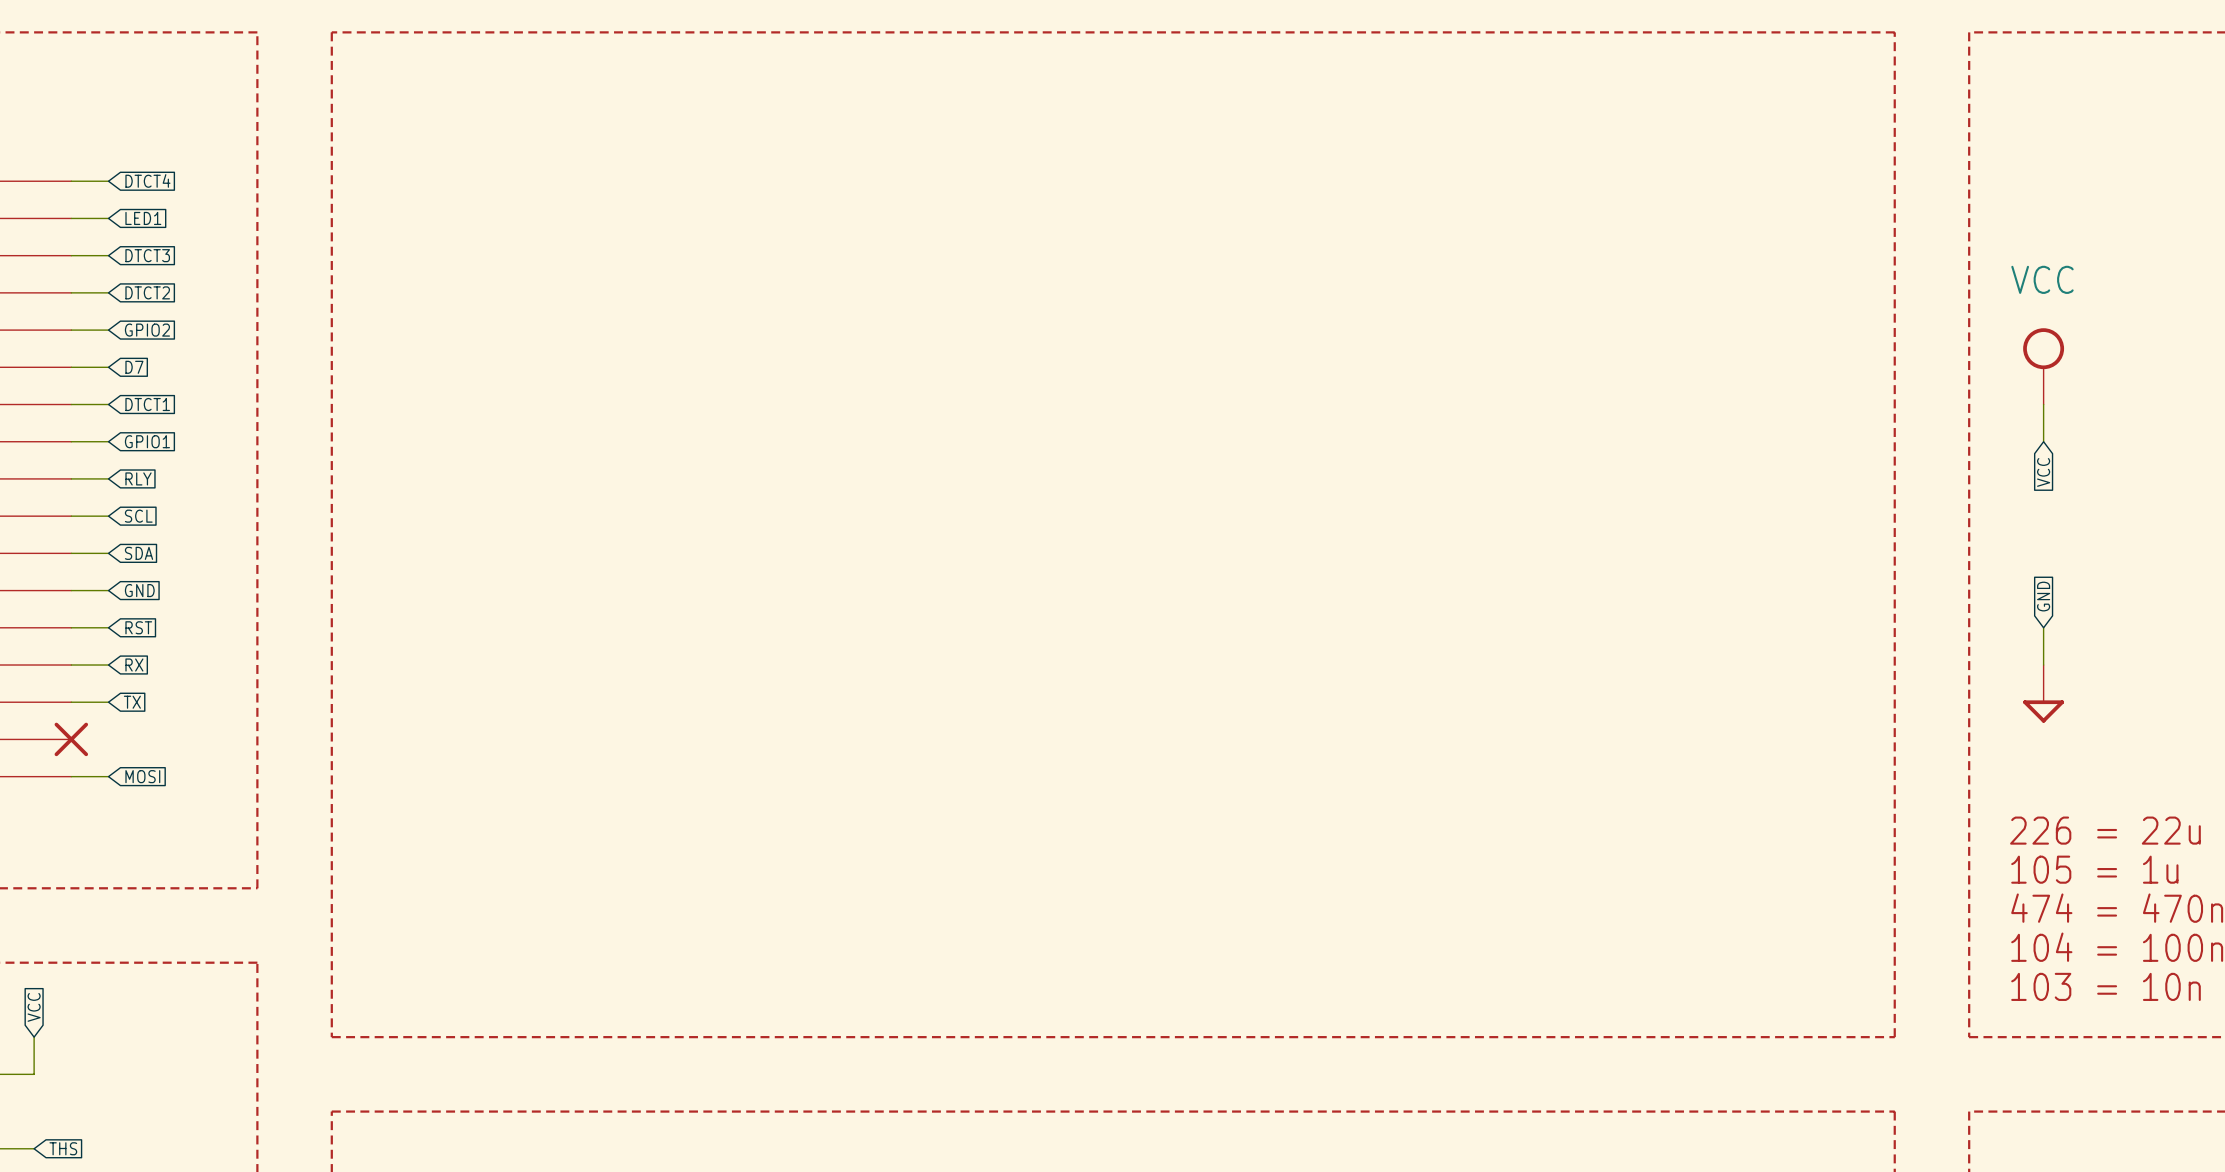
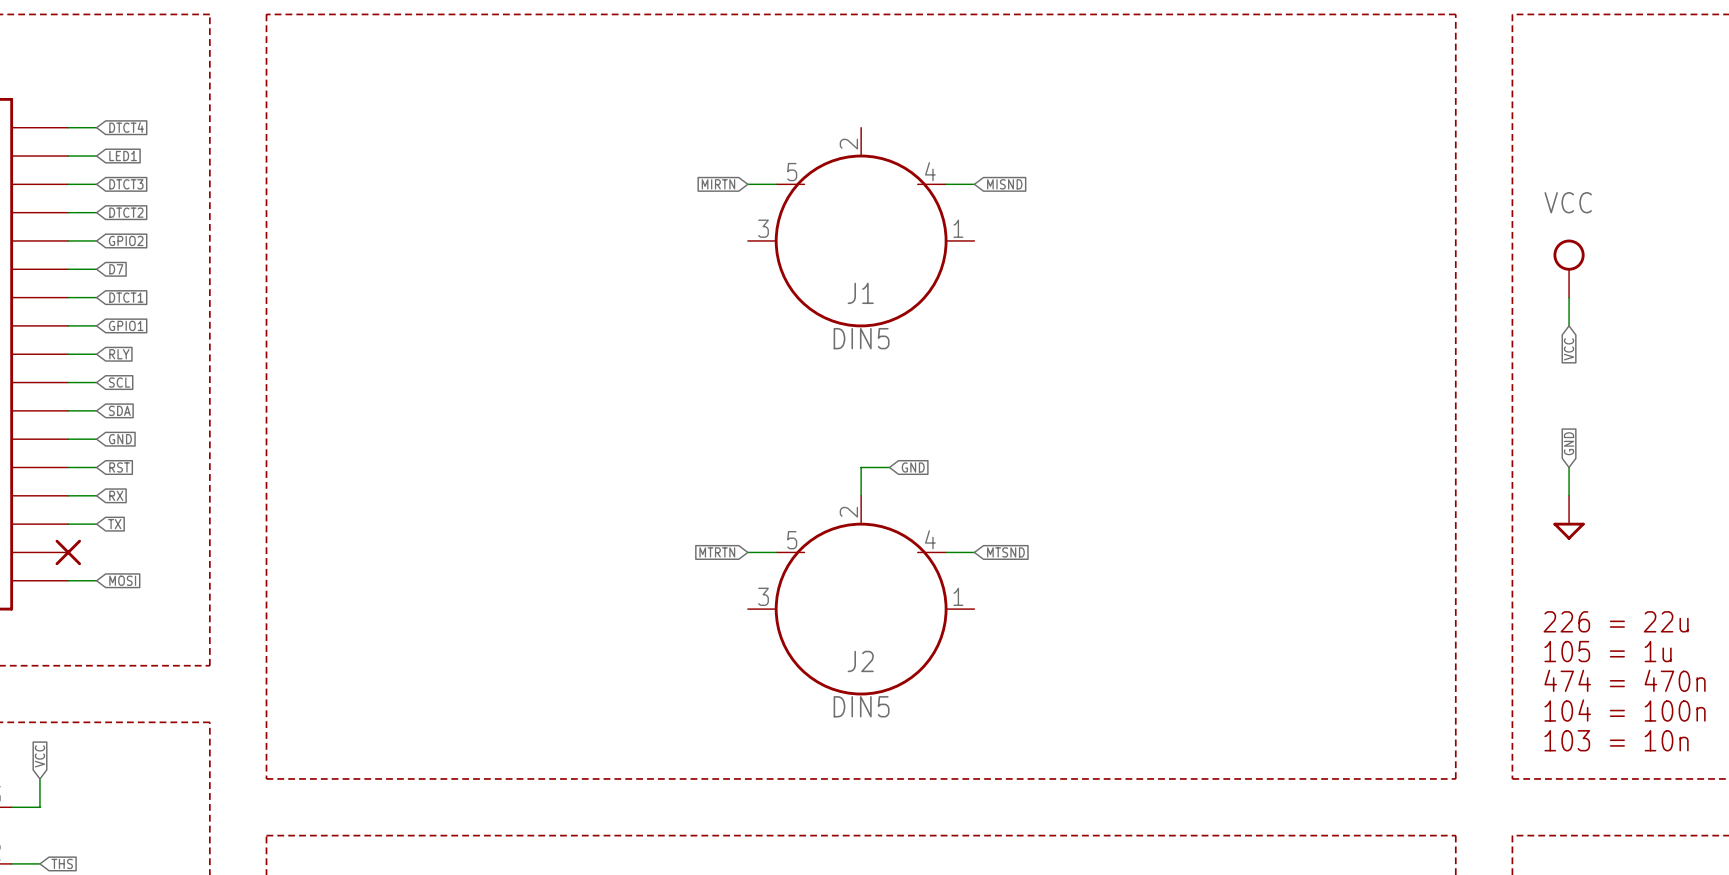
global label: none -> MIRTN (718, 184)
wire: none -> (747, 184) (776, 184)
wire: none -> (946, 184) (974, 184)
global label: none -> MISND (1004, 184)
J1: none -> DIN5 (861, 227)
wire: none -> (889, 467) (861, 467) (861, 495)
global label: none -> GND (913, 467)
global label: none -> MTRTN (717, 552)
wire: none -> (747, 552) (776, 552)
wire: none -> (946, 552) (974, 552)
global label: none -> MTSND (1005, 552)
J2: none -> DIN5 (861, 595)

